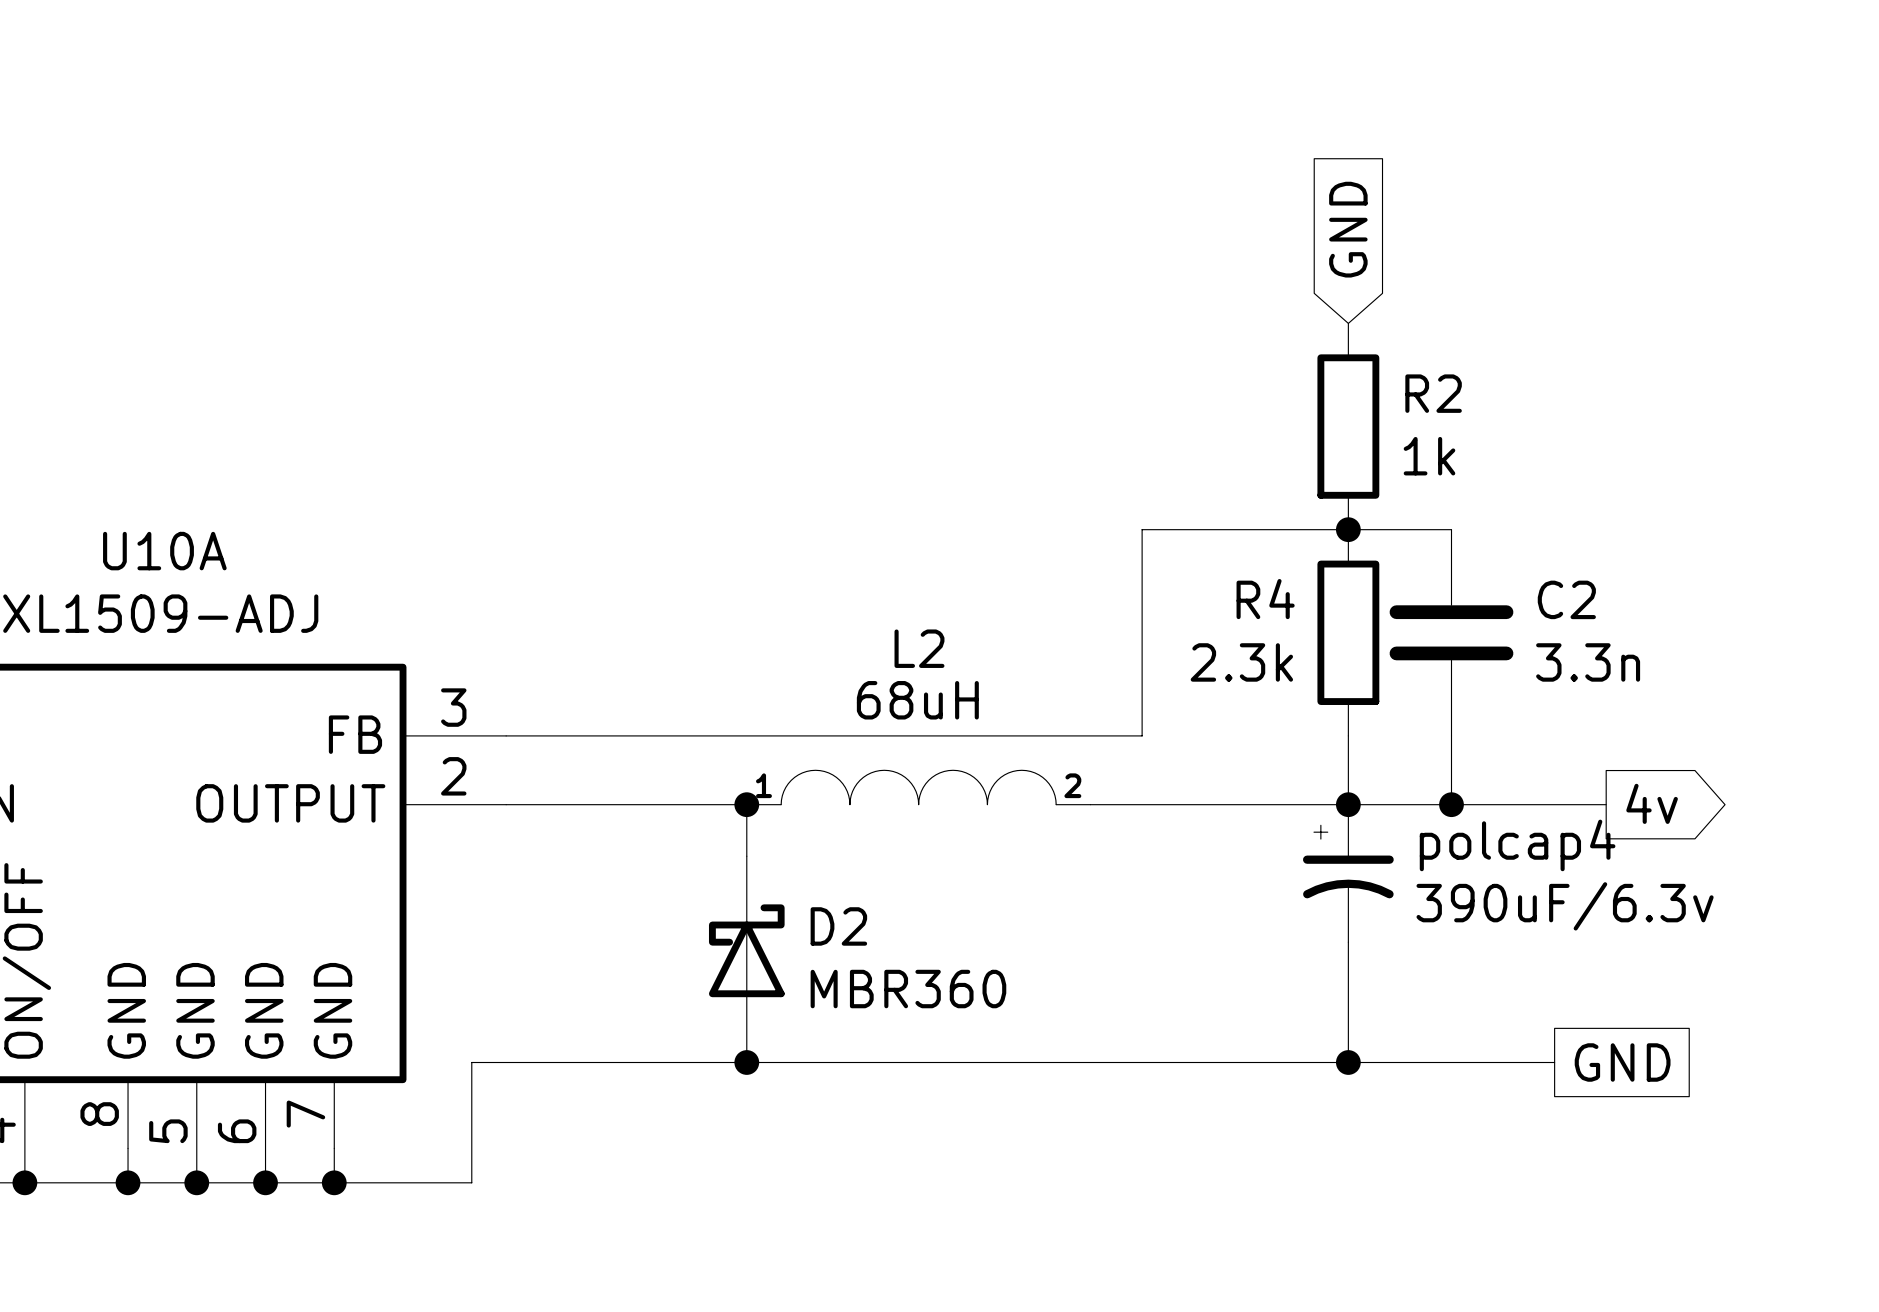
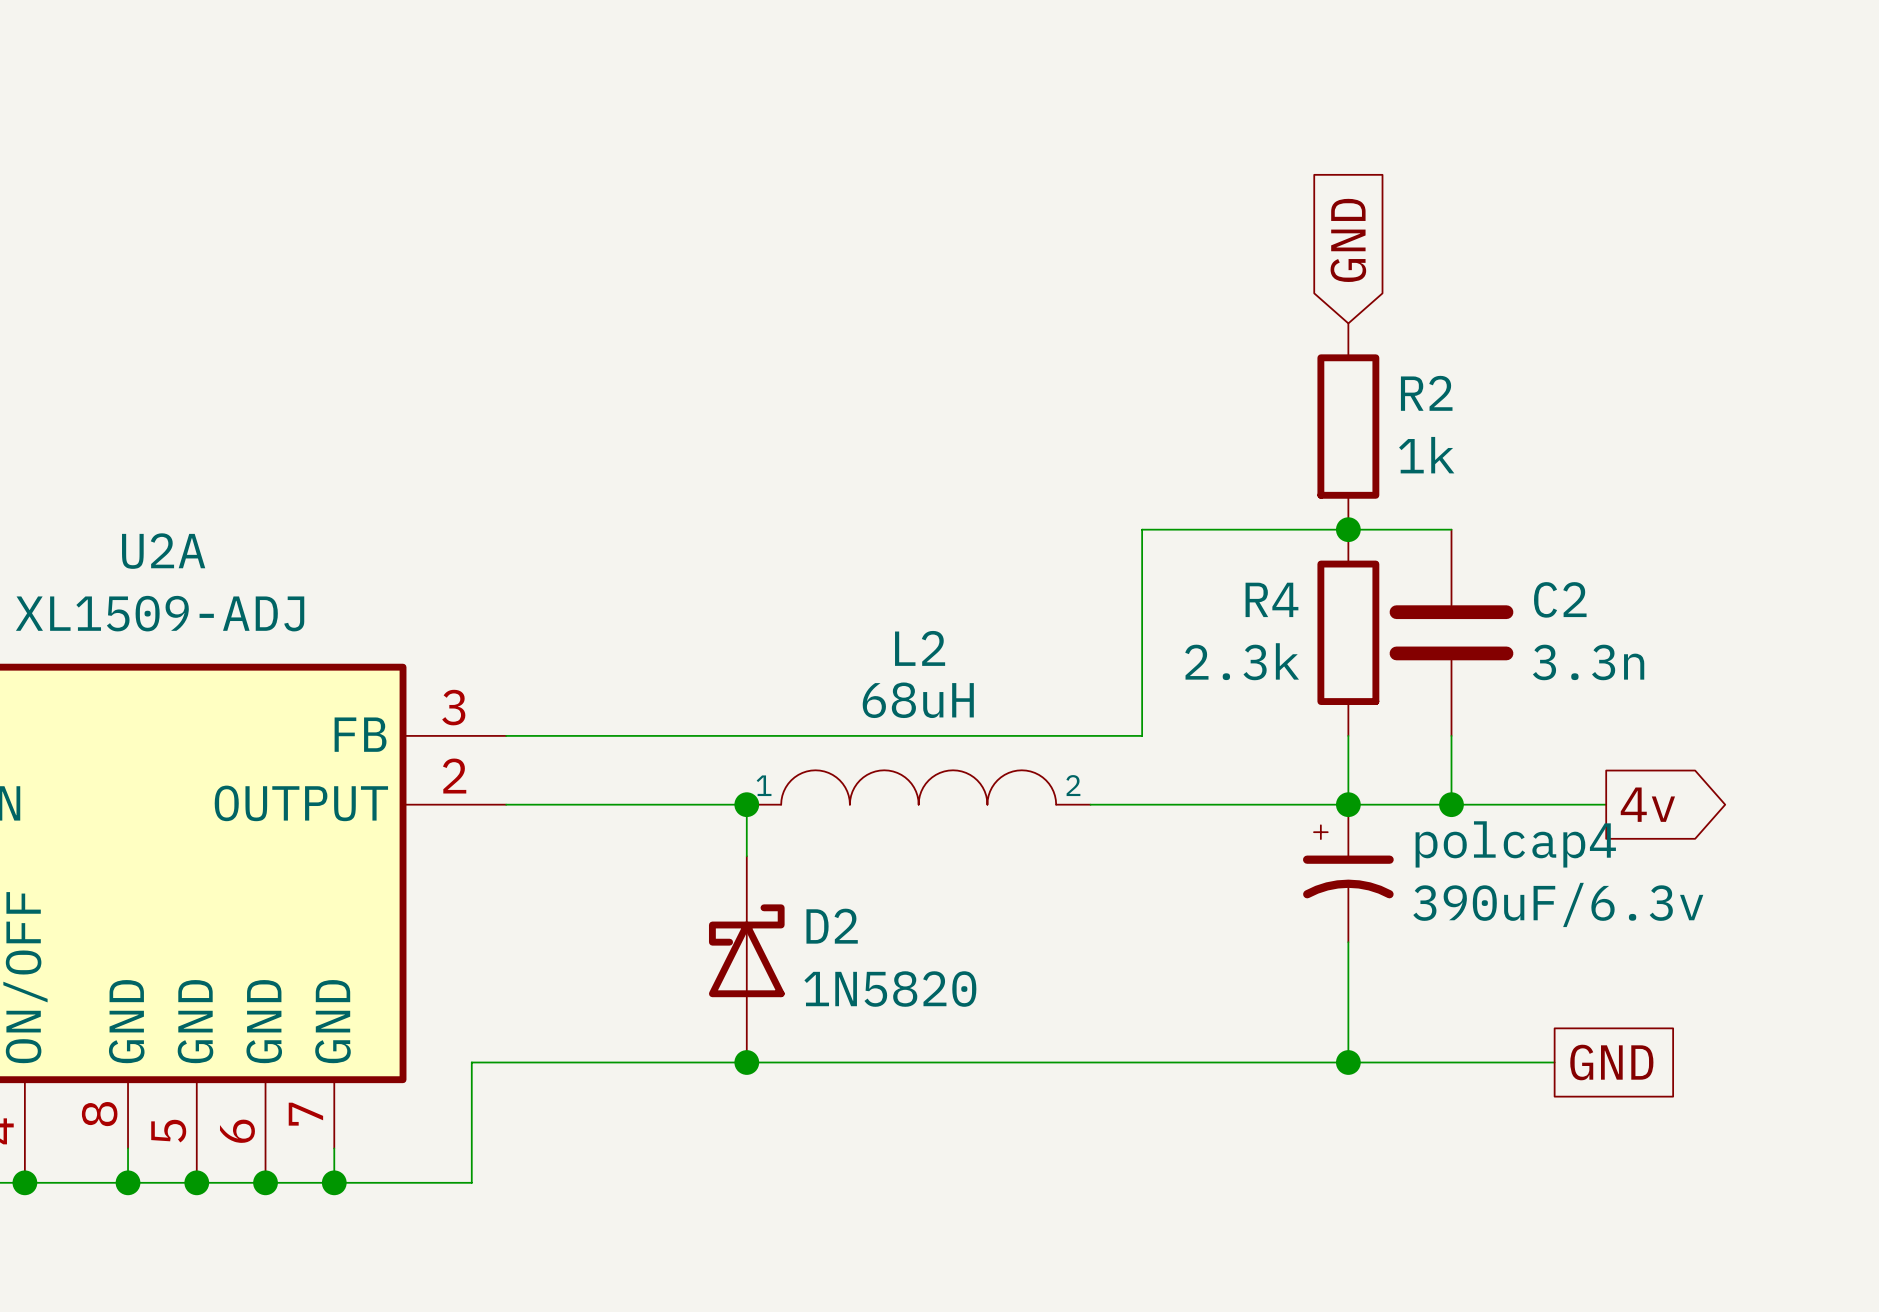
U10A name: U10A (164, 551) -> U2A (163, 551)
D2 value: MBR360 (908, 989) -> 1N5820 (890, 989)

